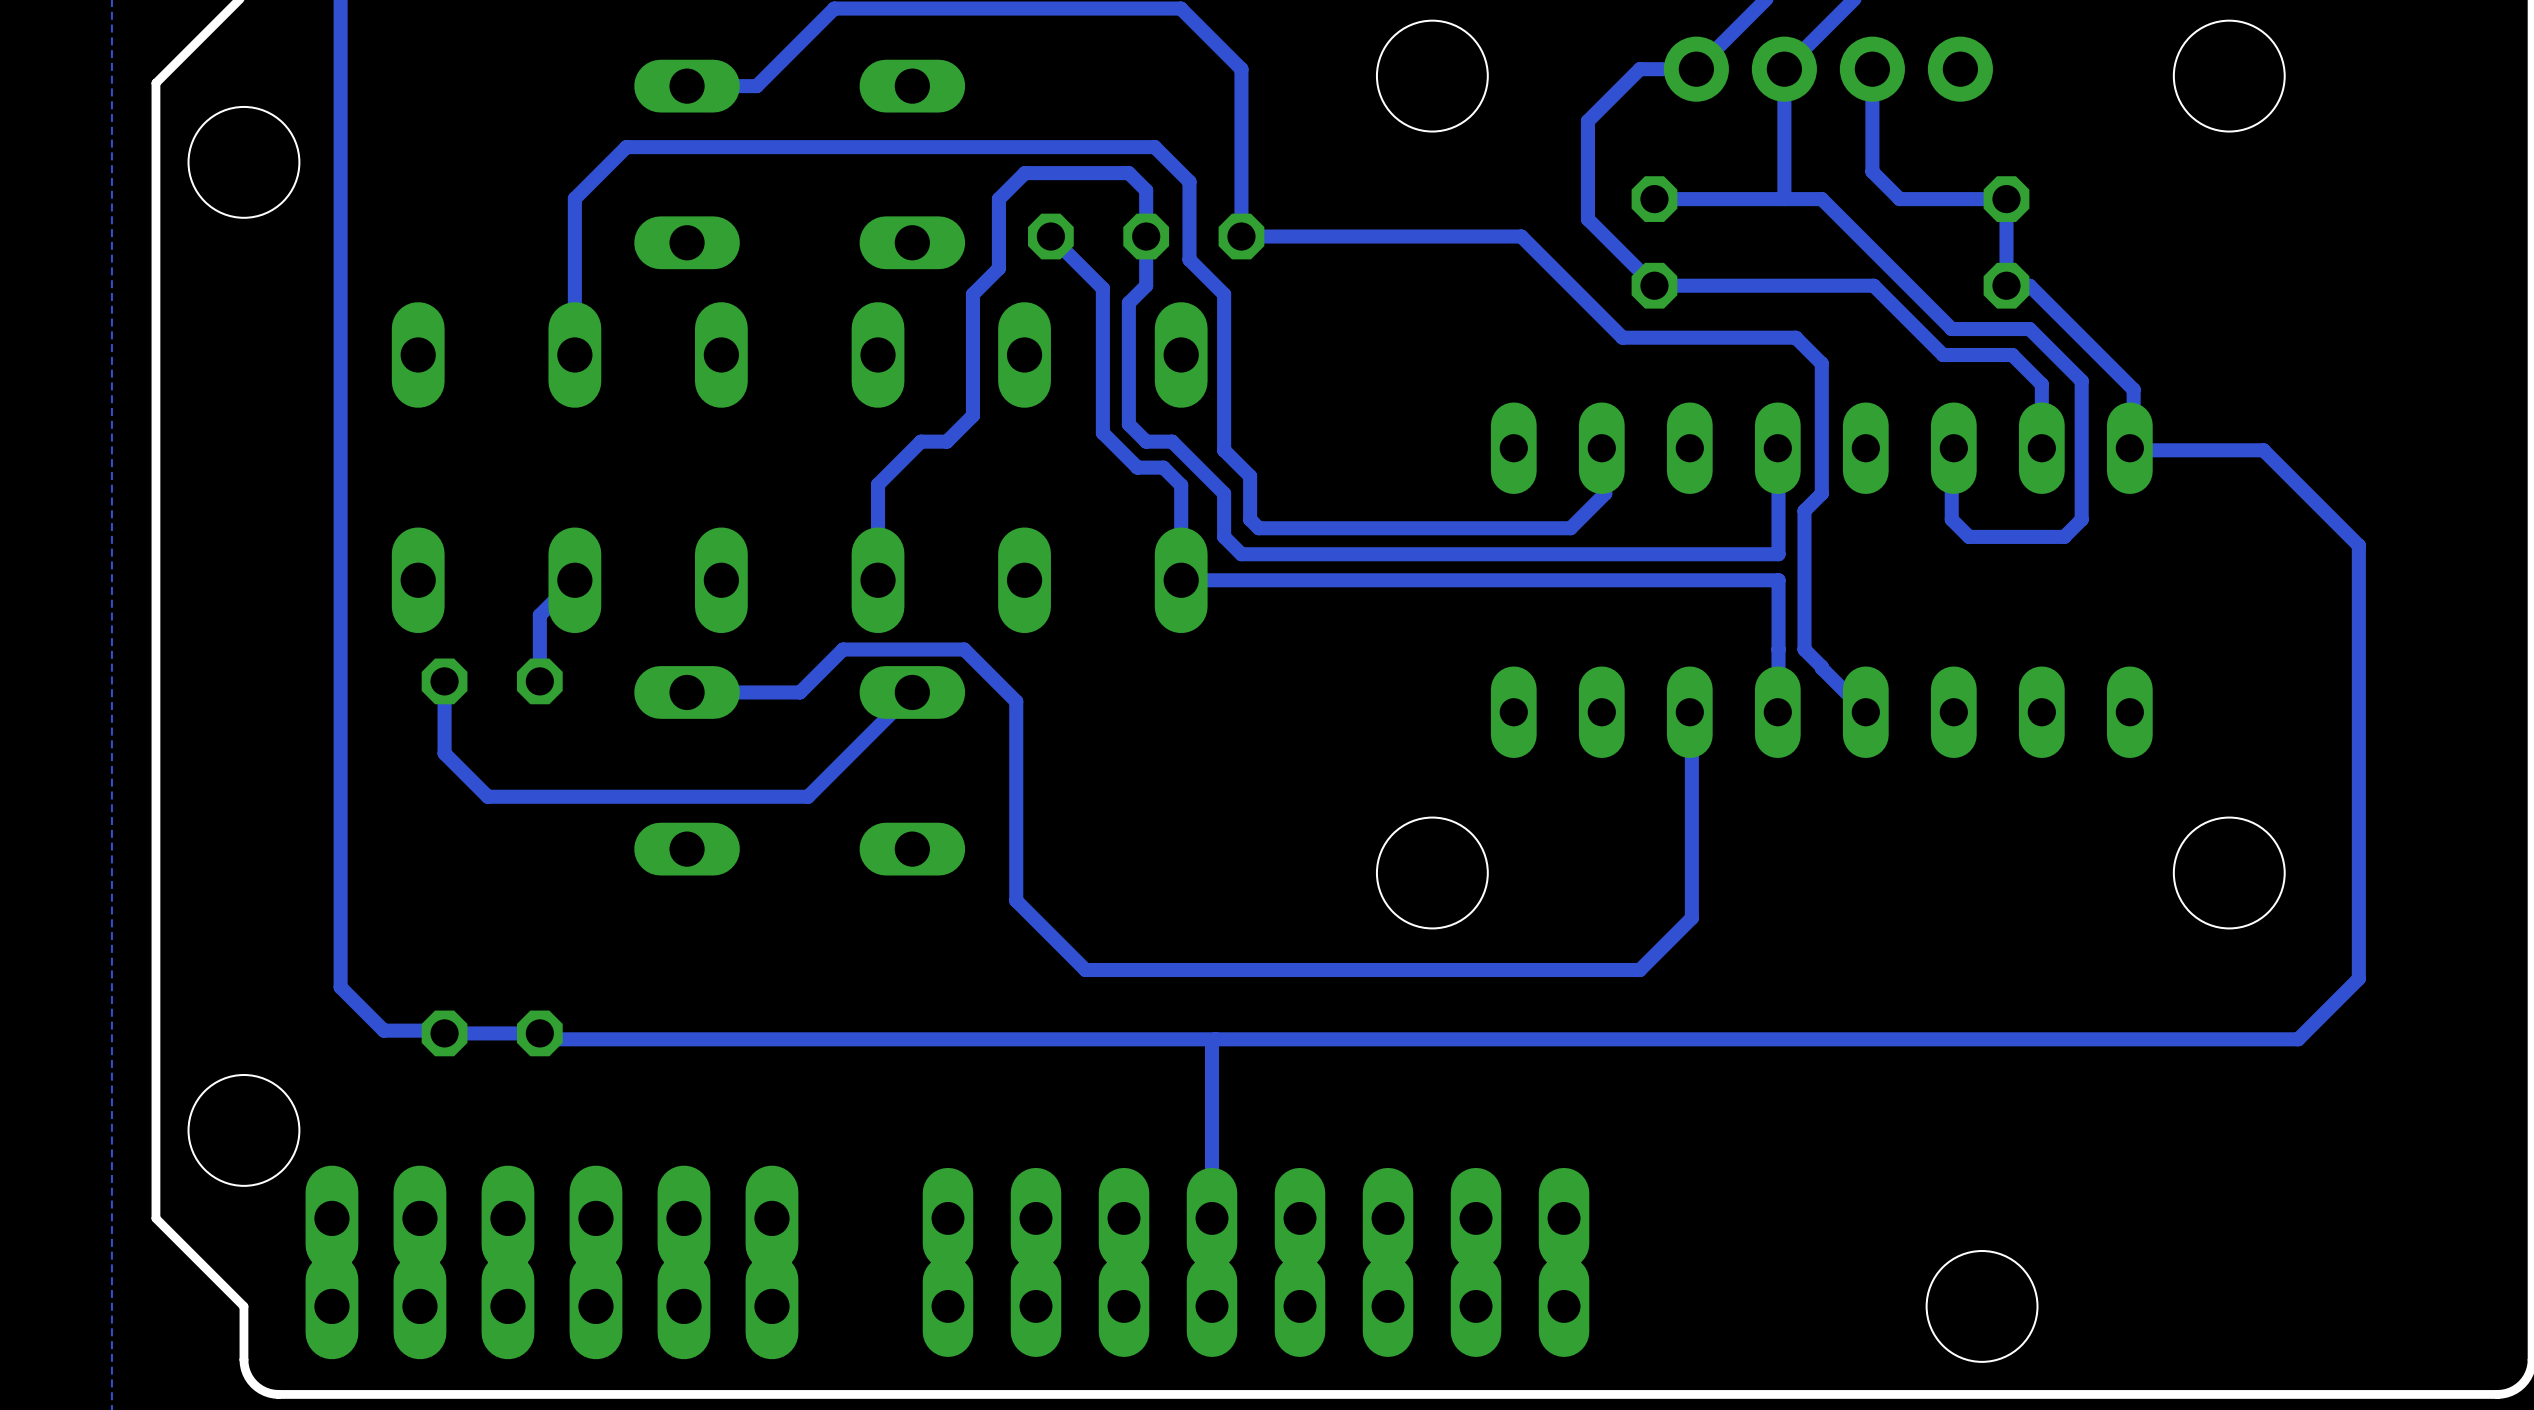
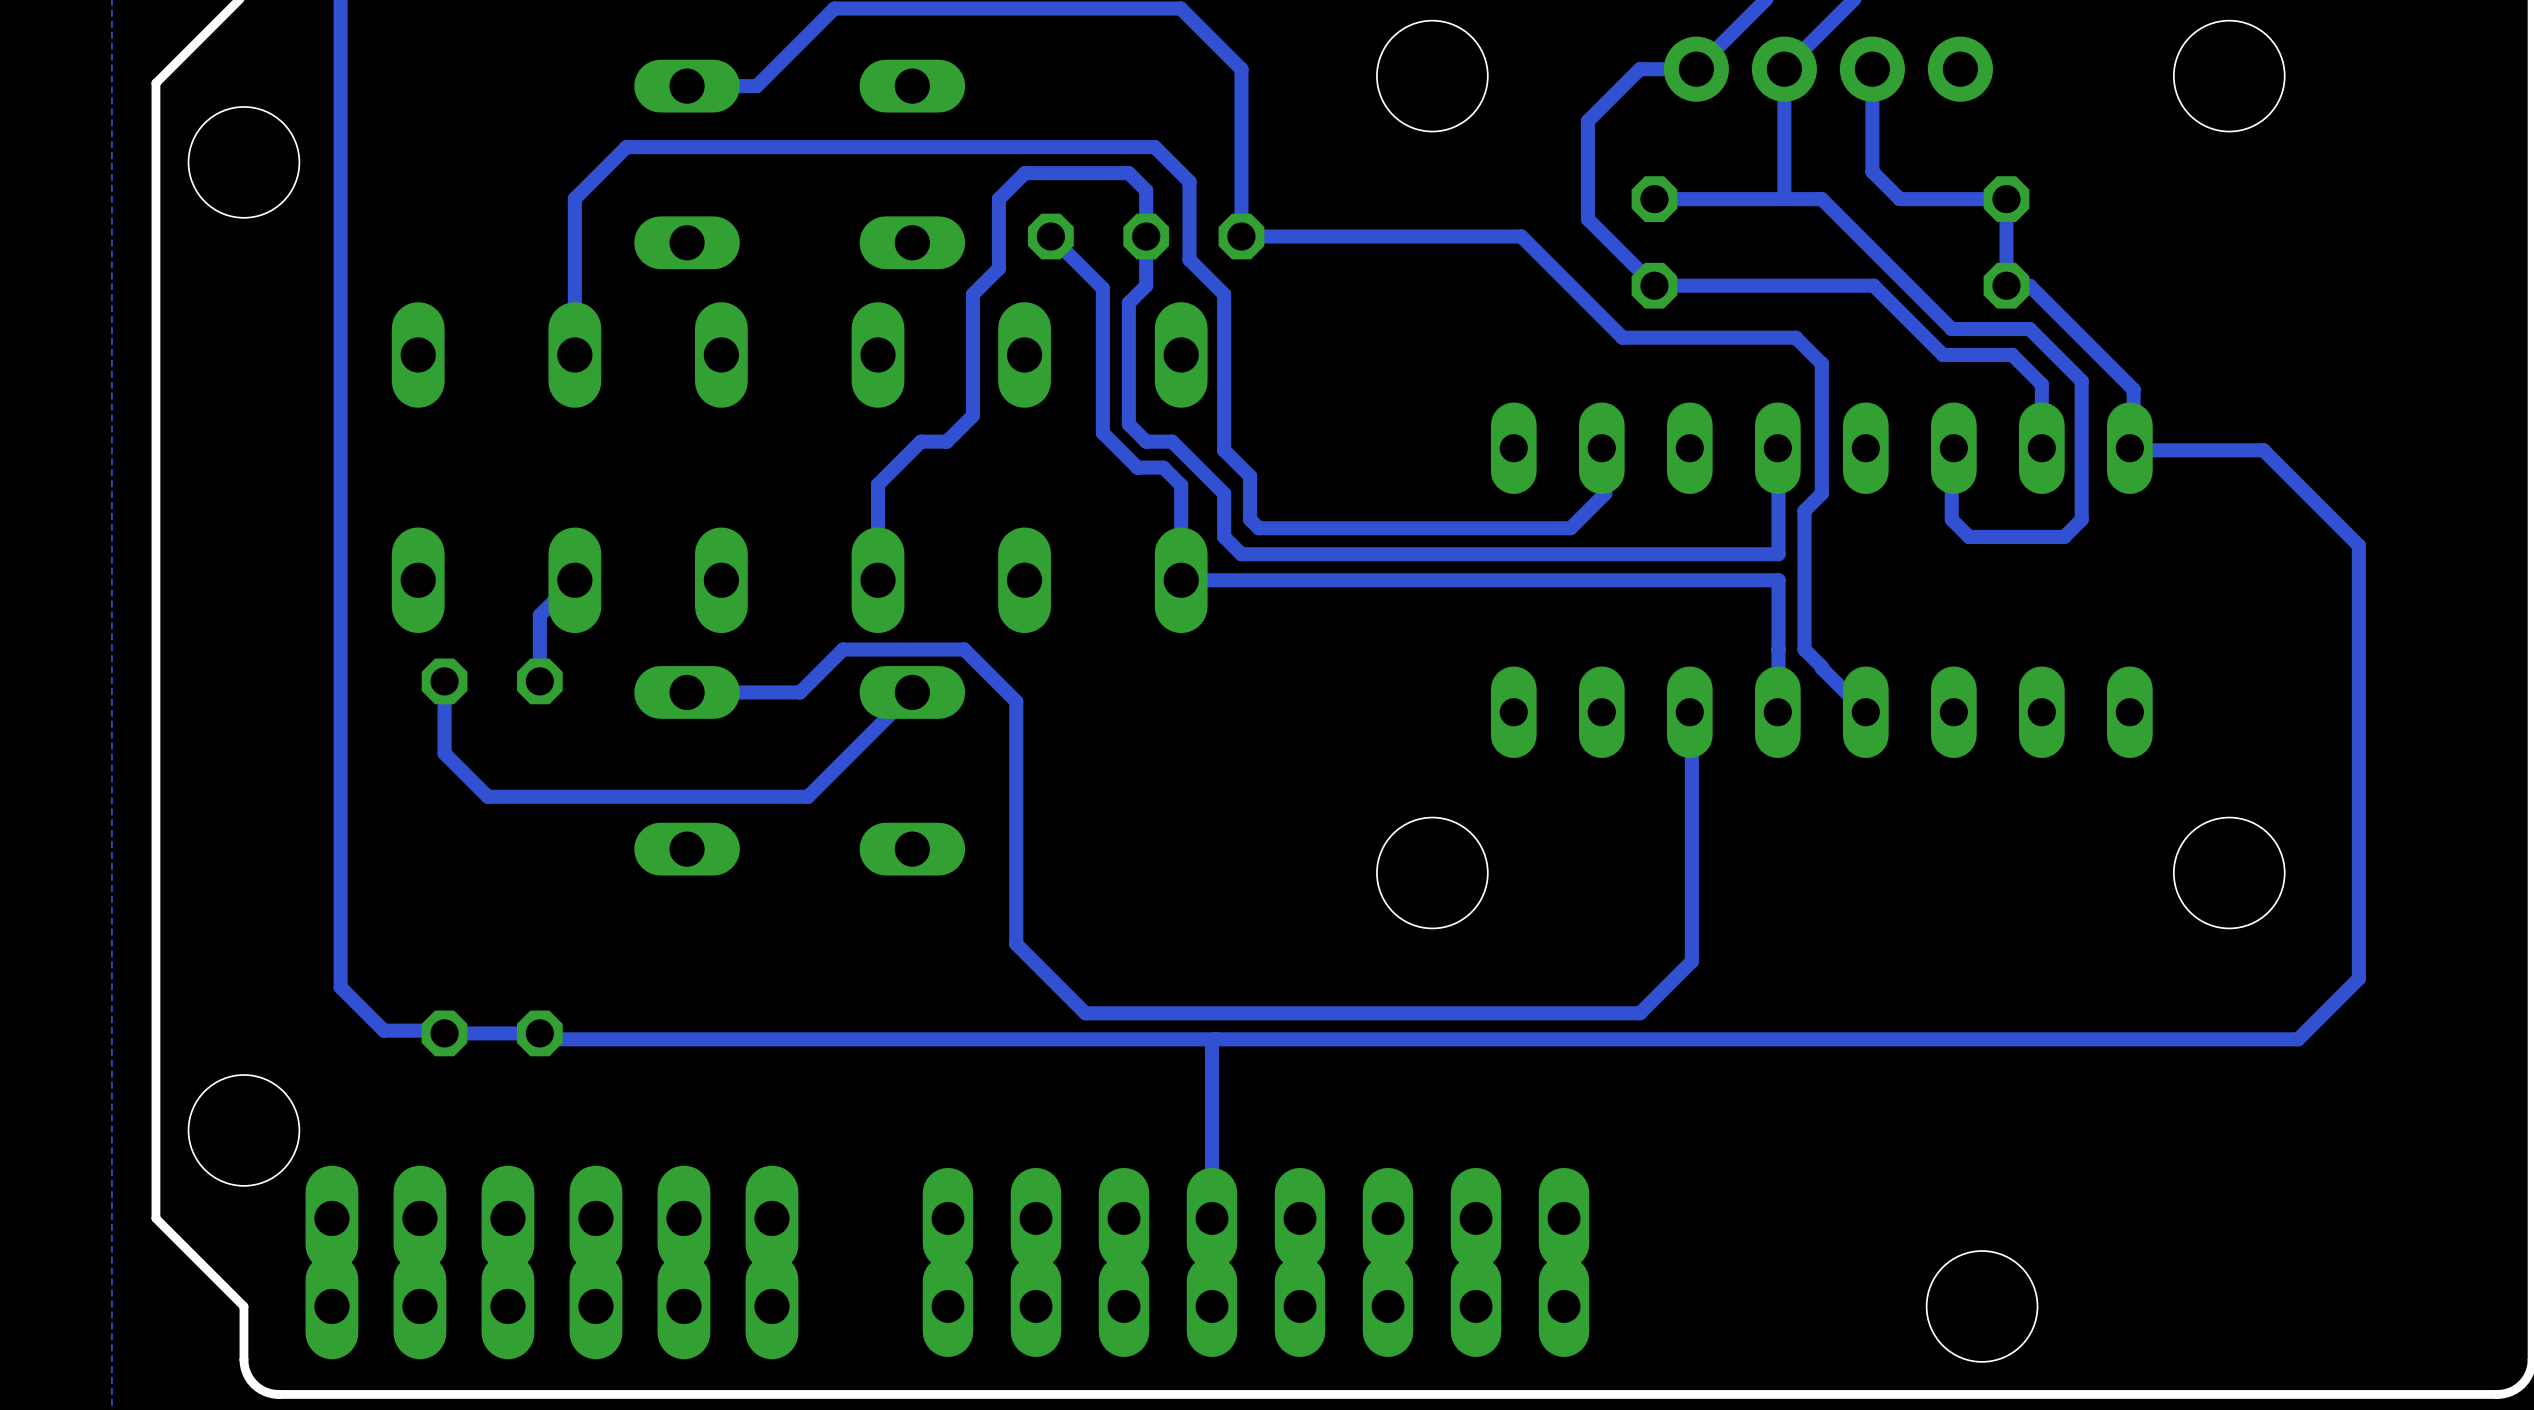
track: (1016, 900) (1085, 970) (1639, 970) (1691, 918) -> (1016, 900) (1016, 944) (1085, 1013) (1639, 1013) (1691, 961) (1691, 918)

